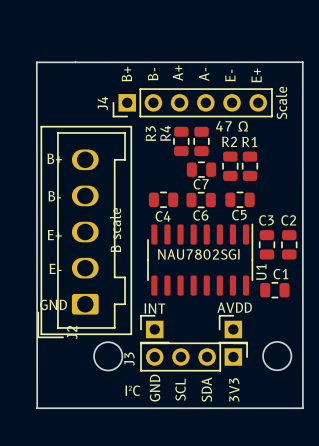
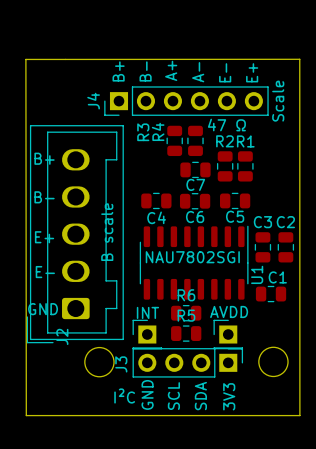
R6: none -> (186, 313)
R5: none -> (186, 333)

